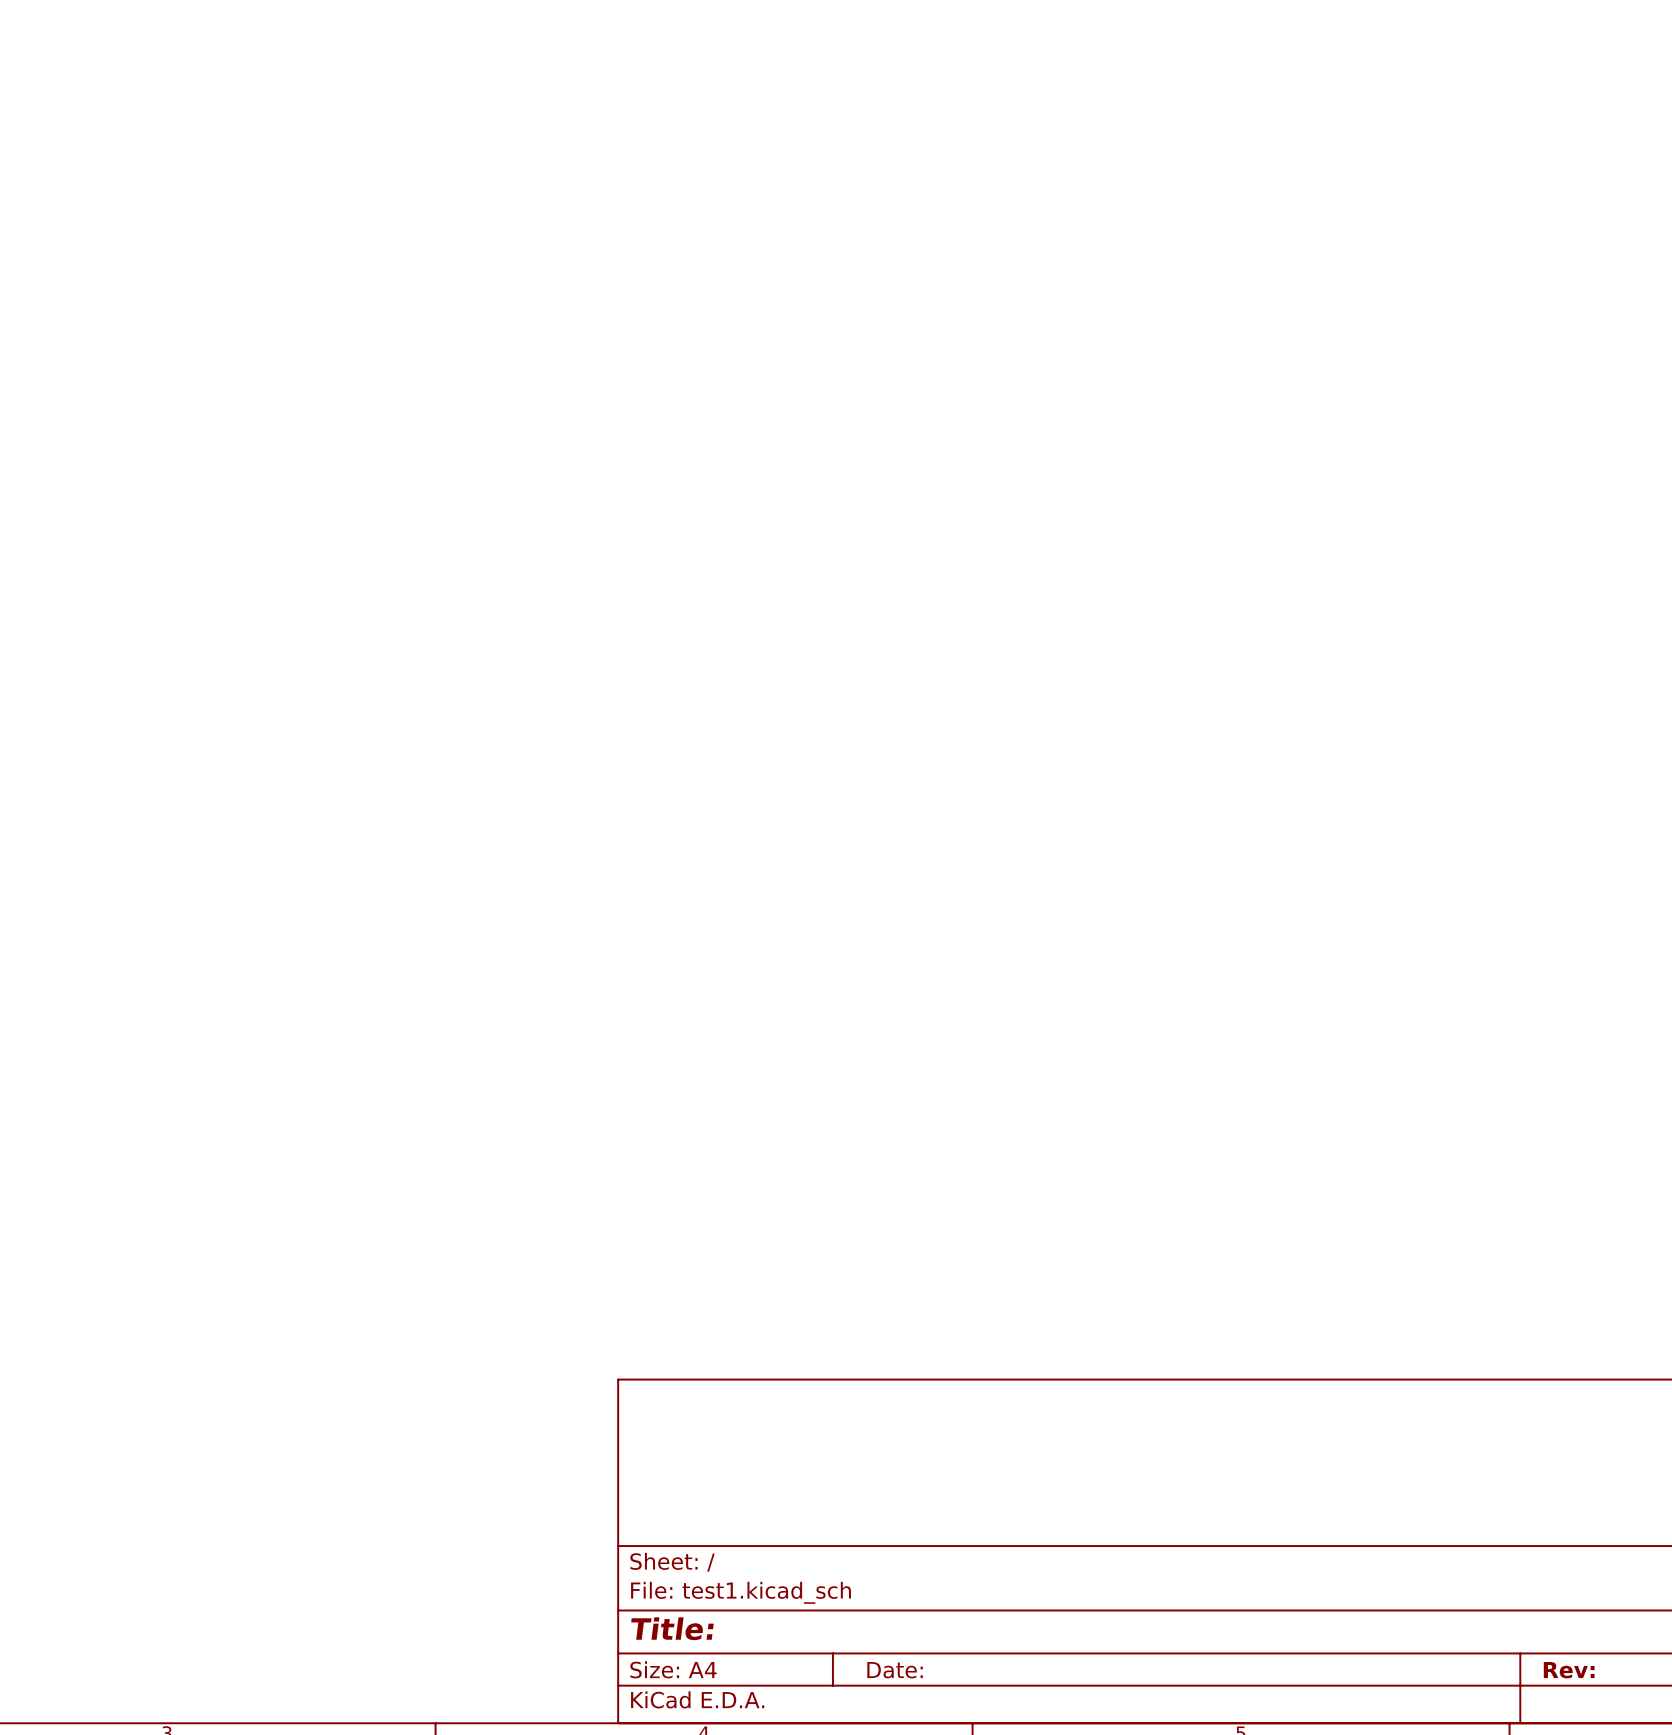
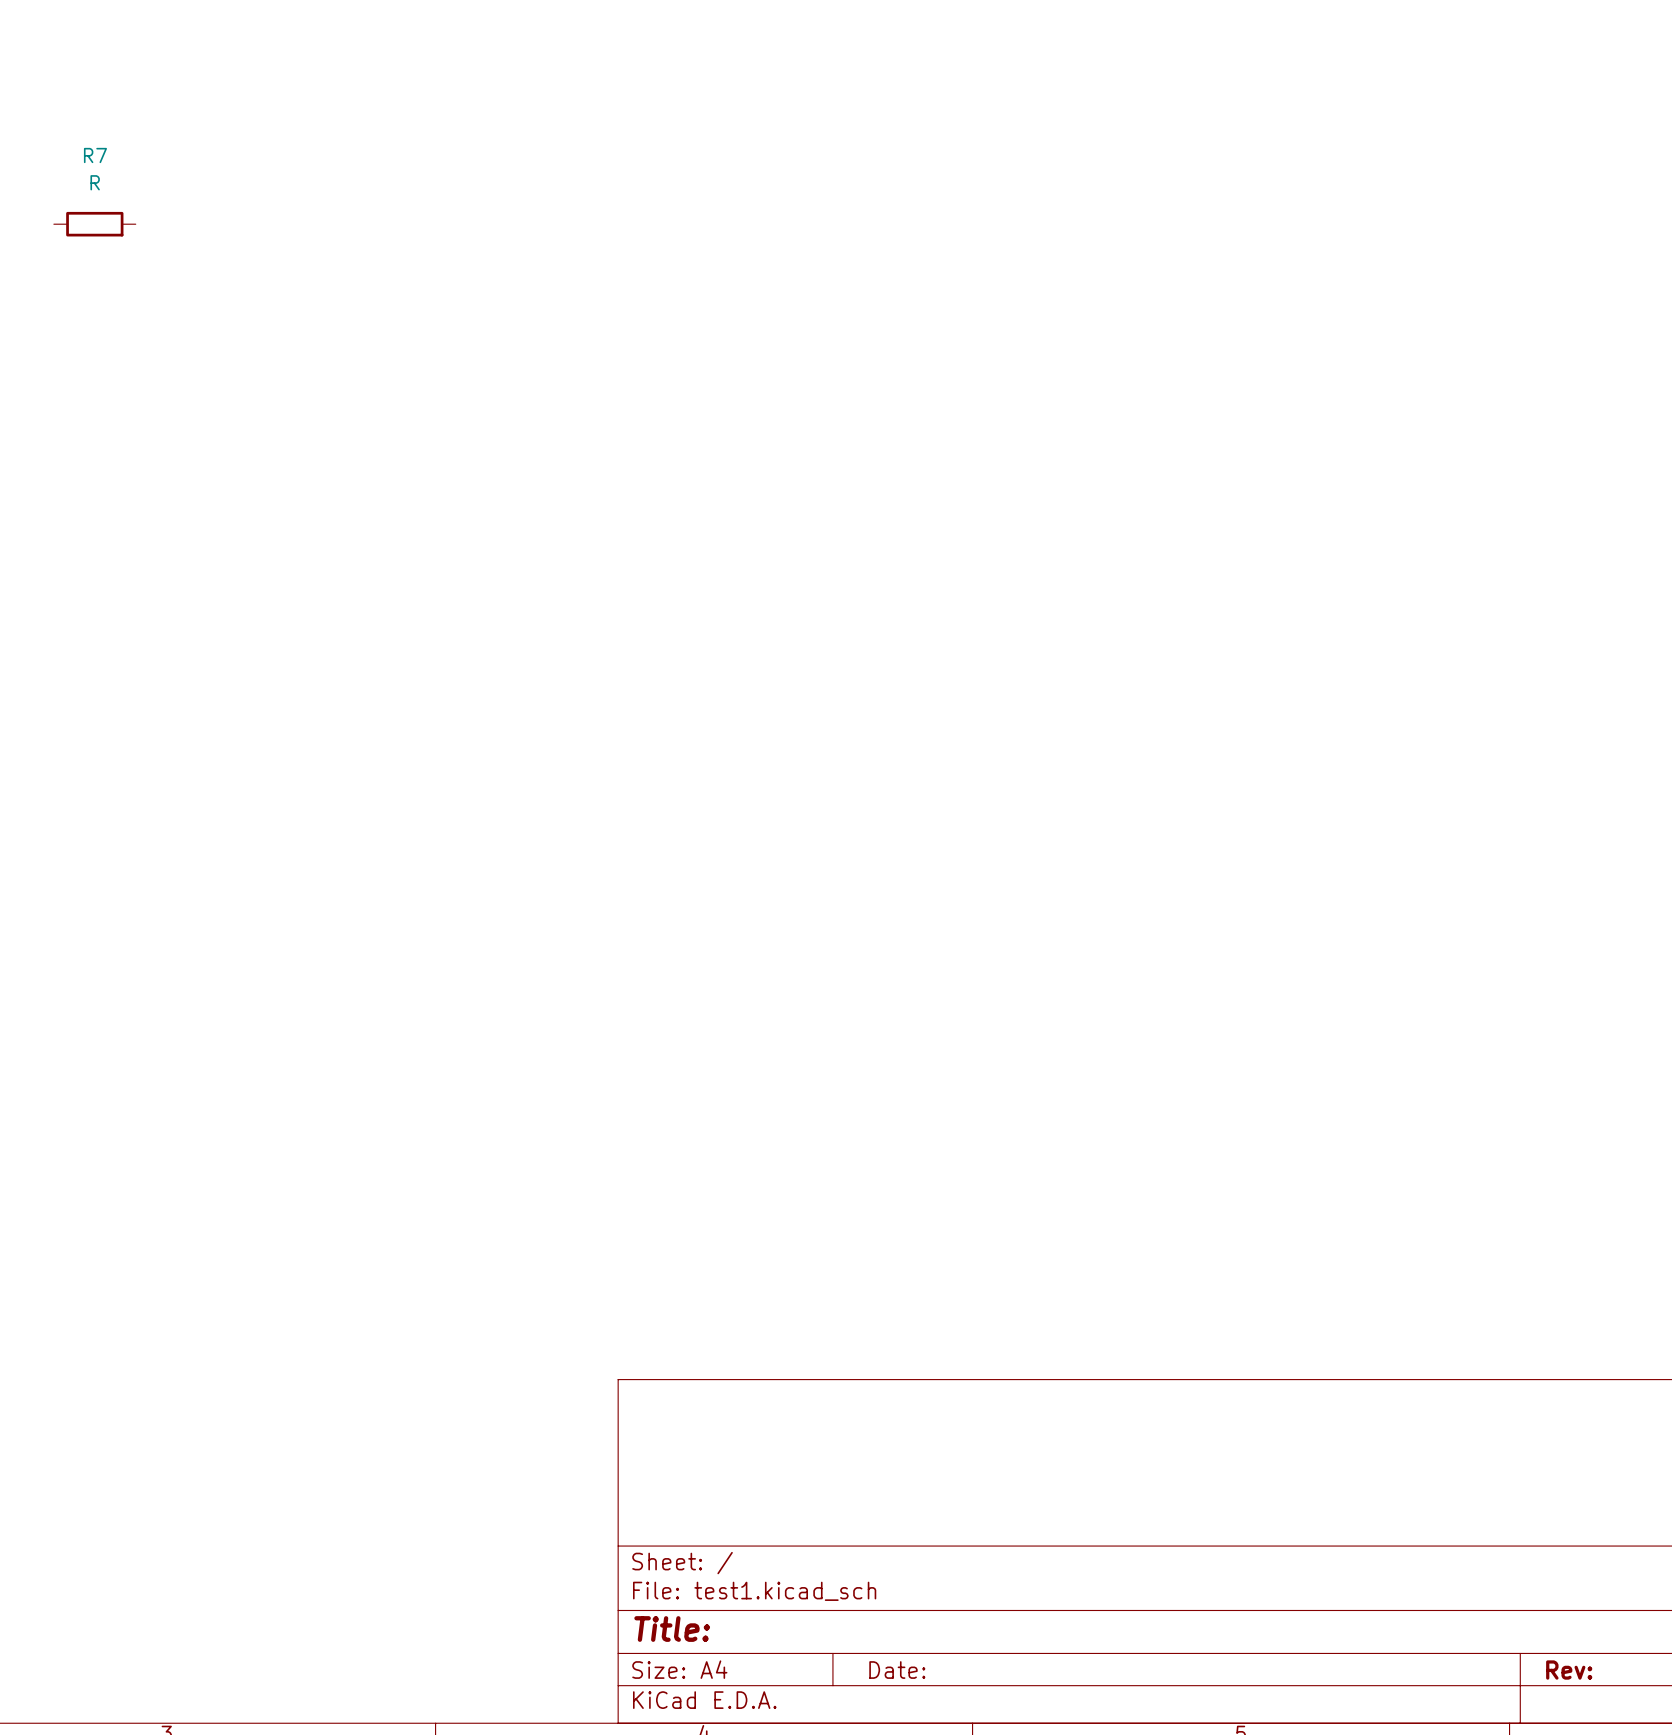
R7: none -> R (94, 224)

